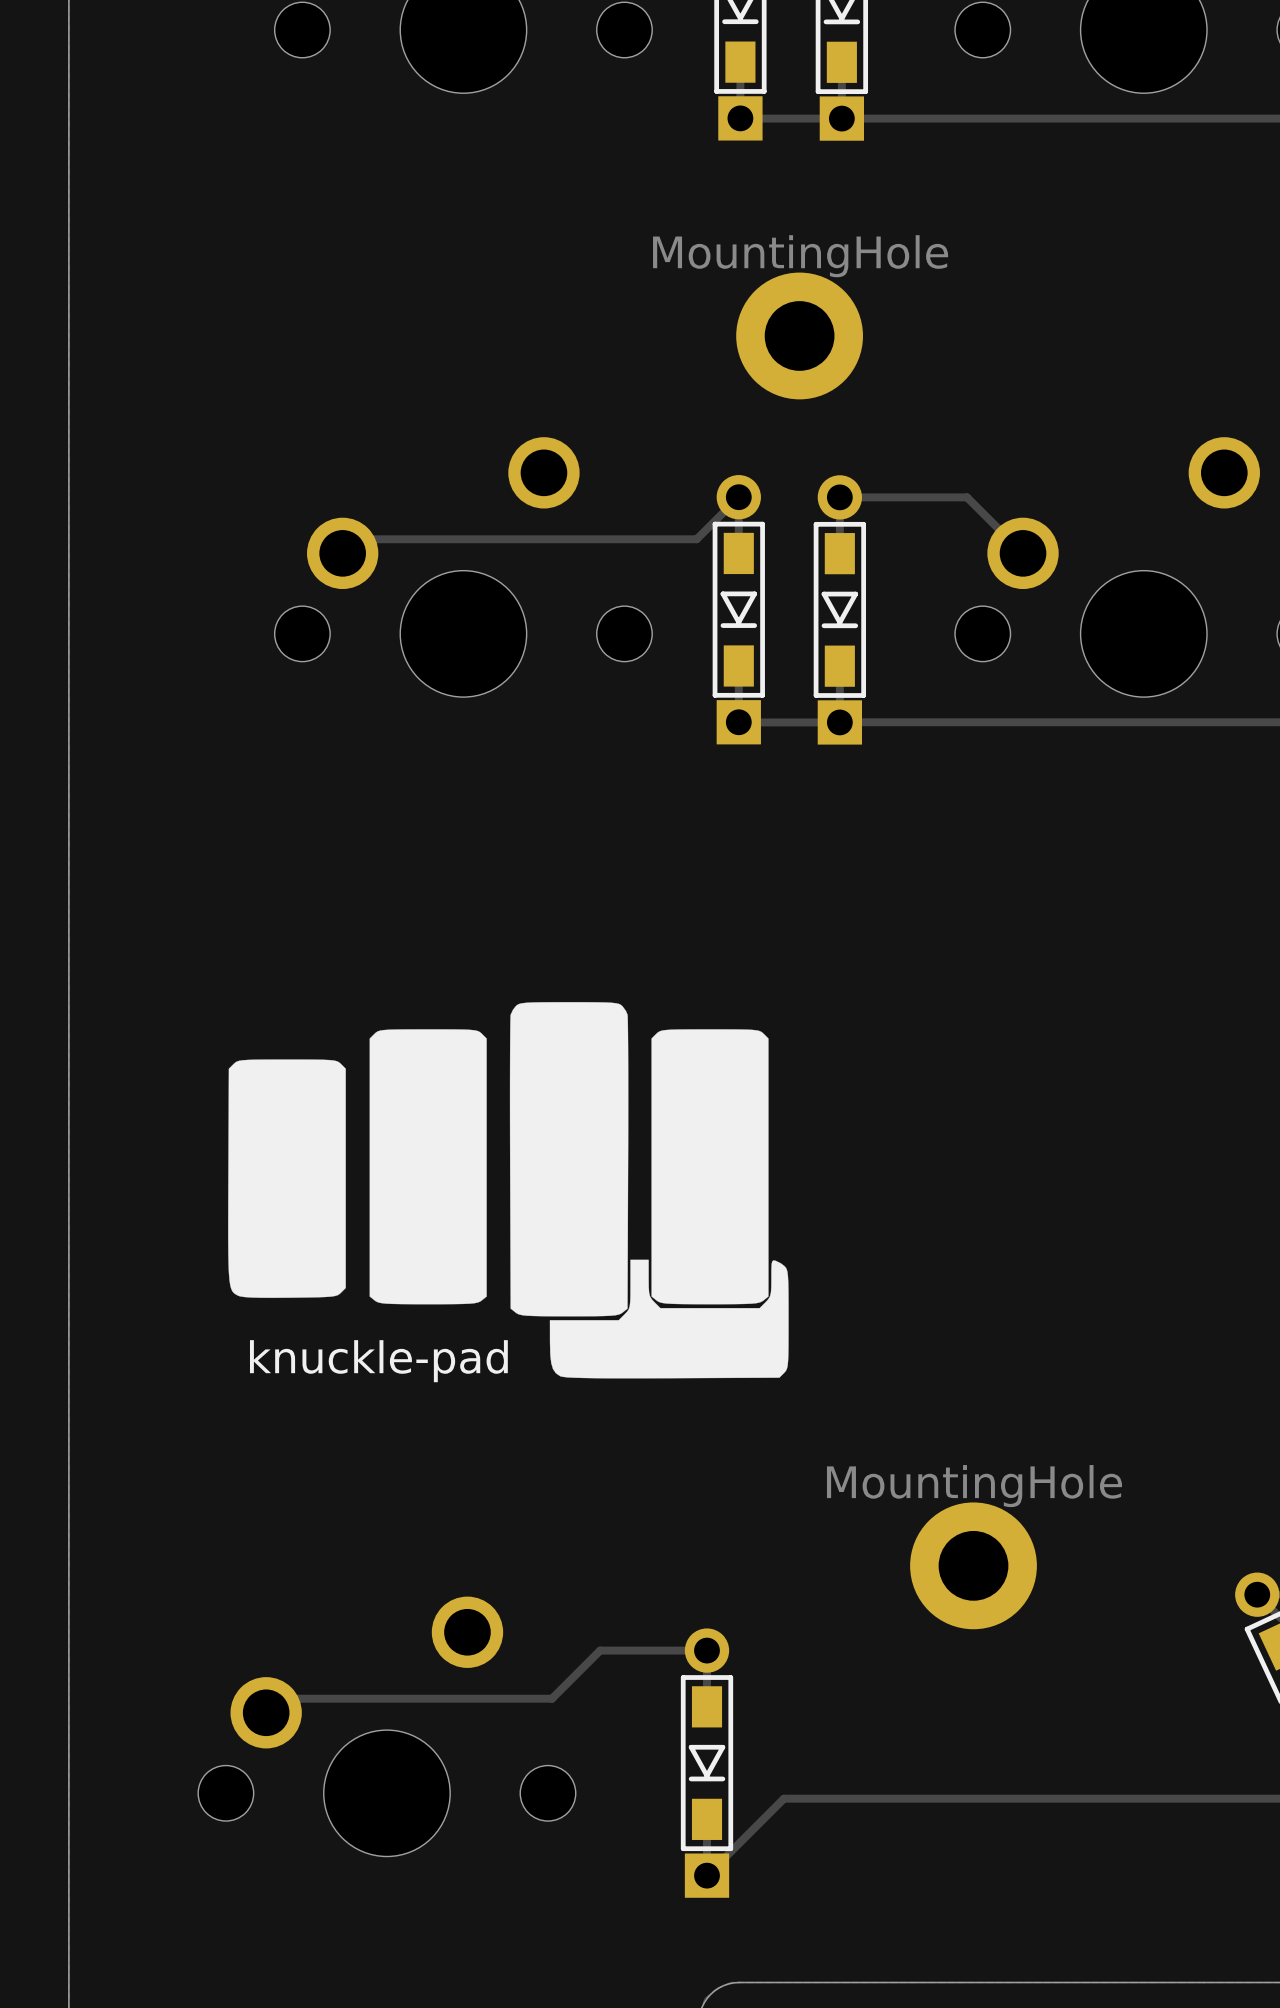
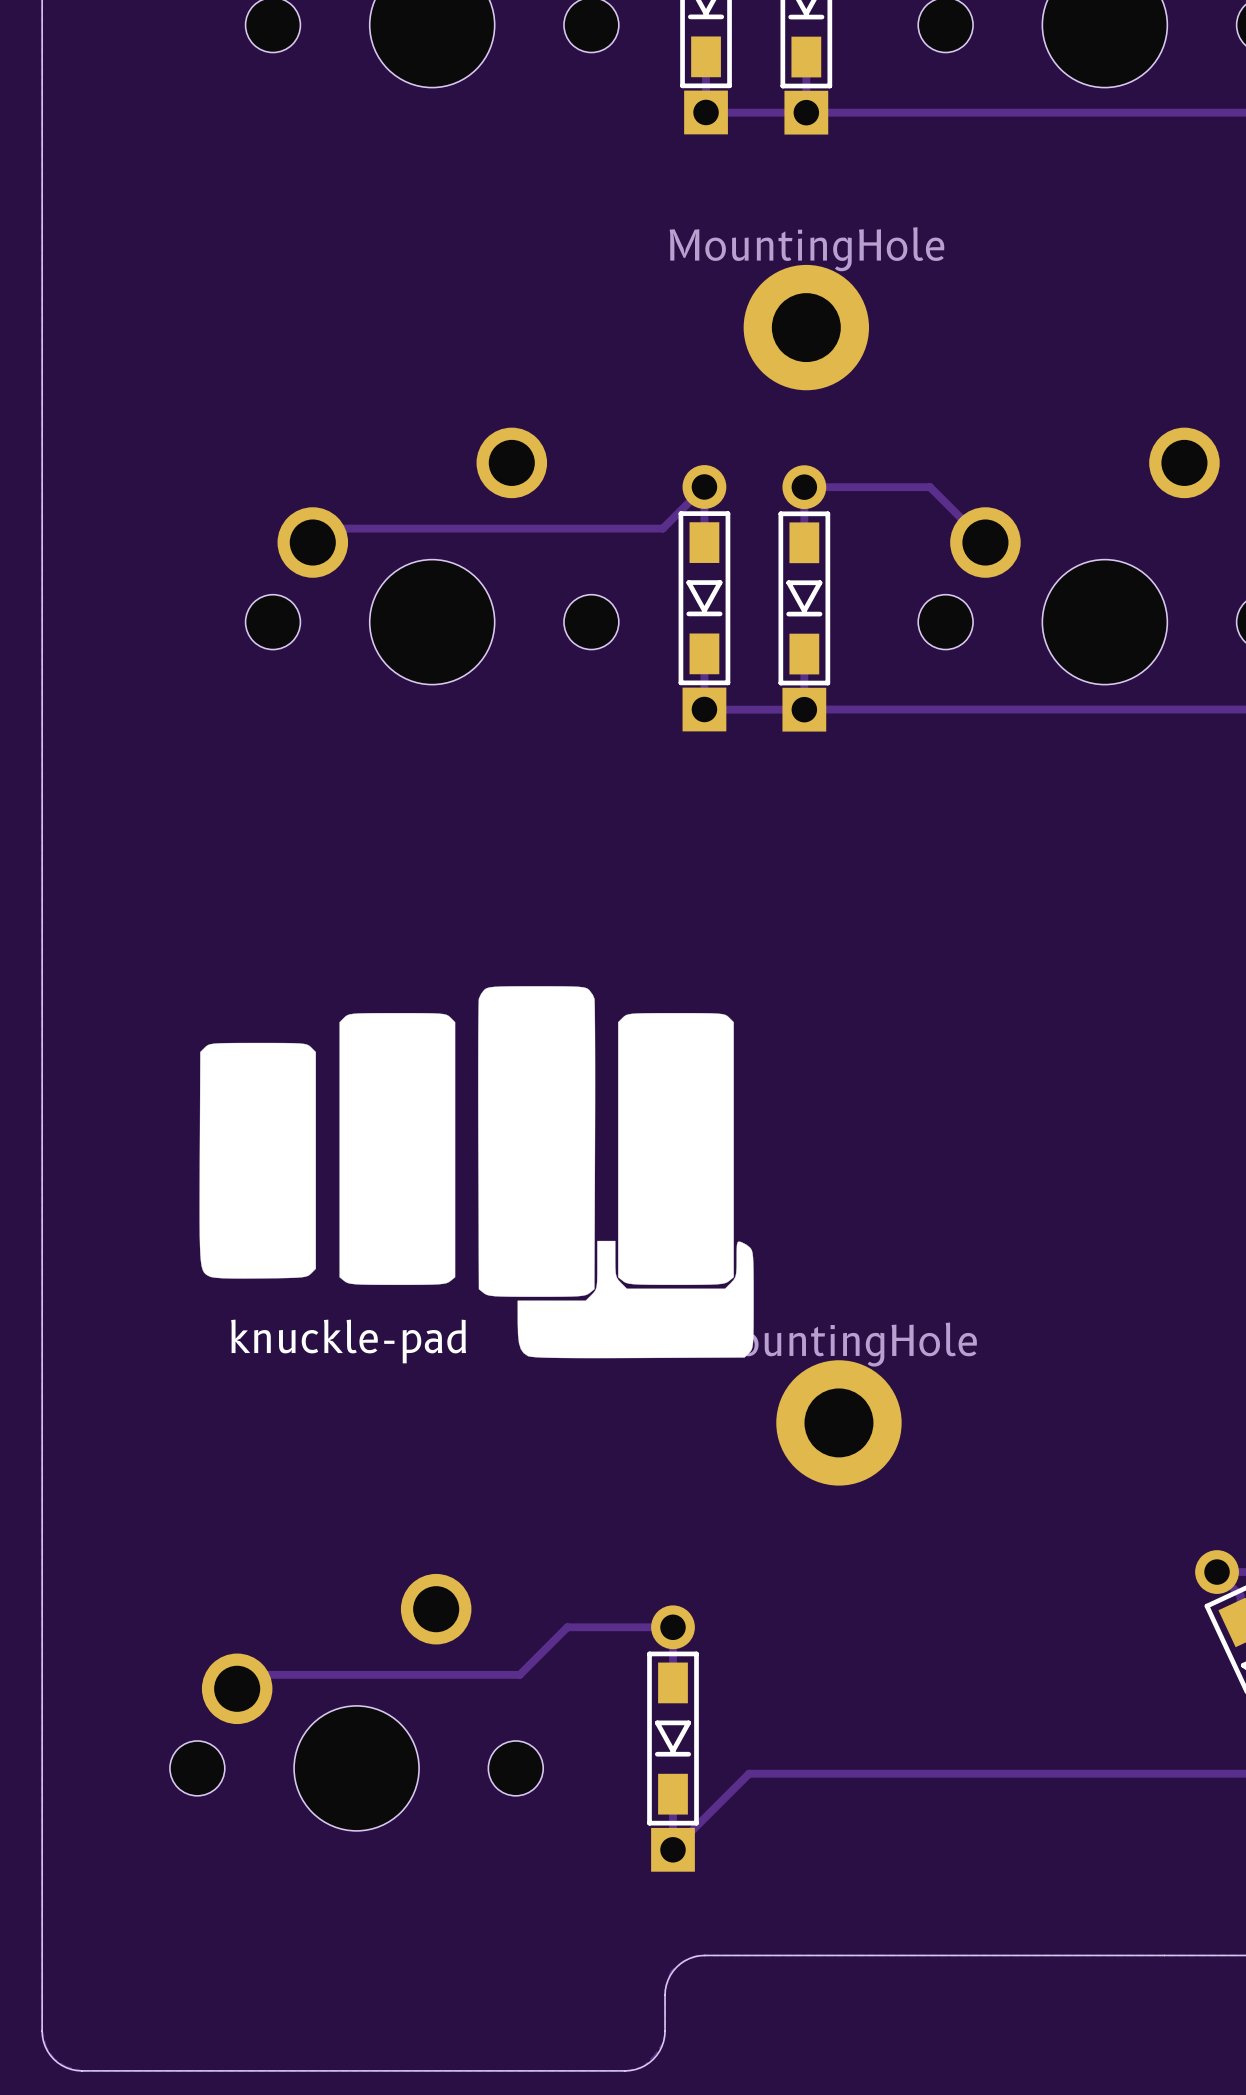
part position: (799, 335) -> (806, 327)
part position: (973, 1565) -> (838, 1422)

